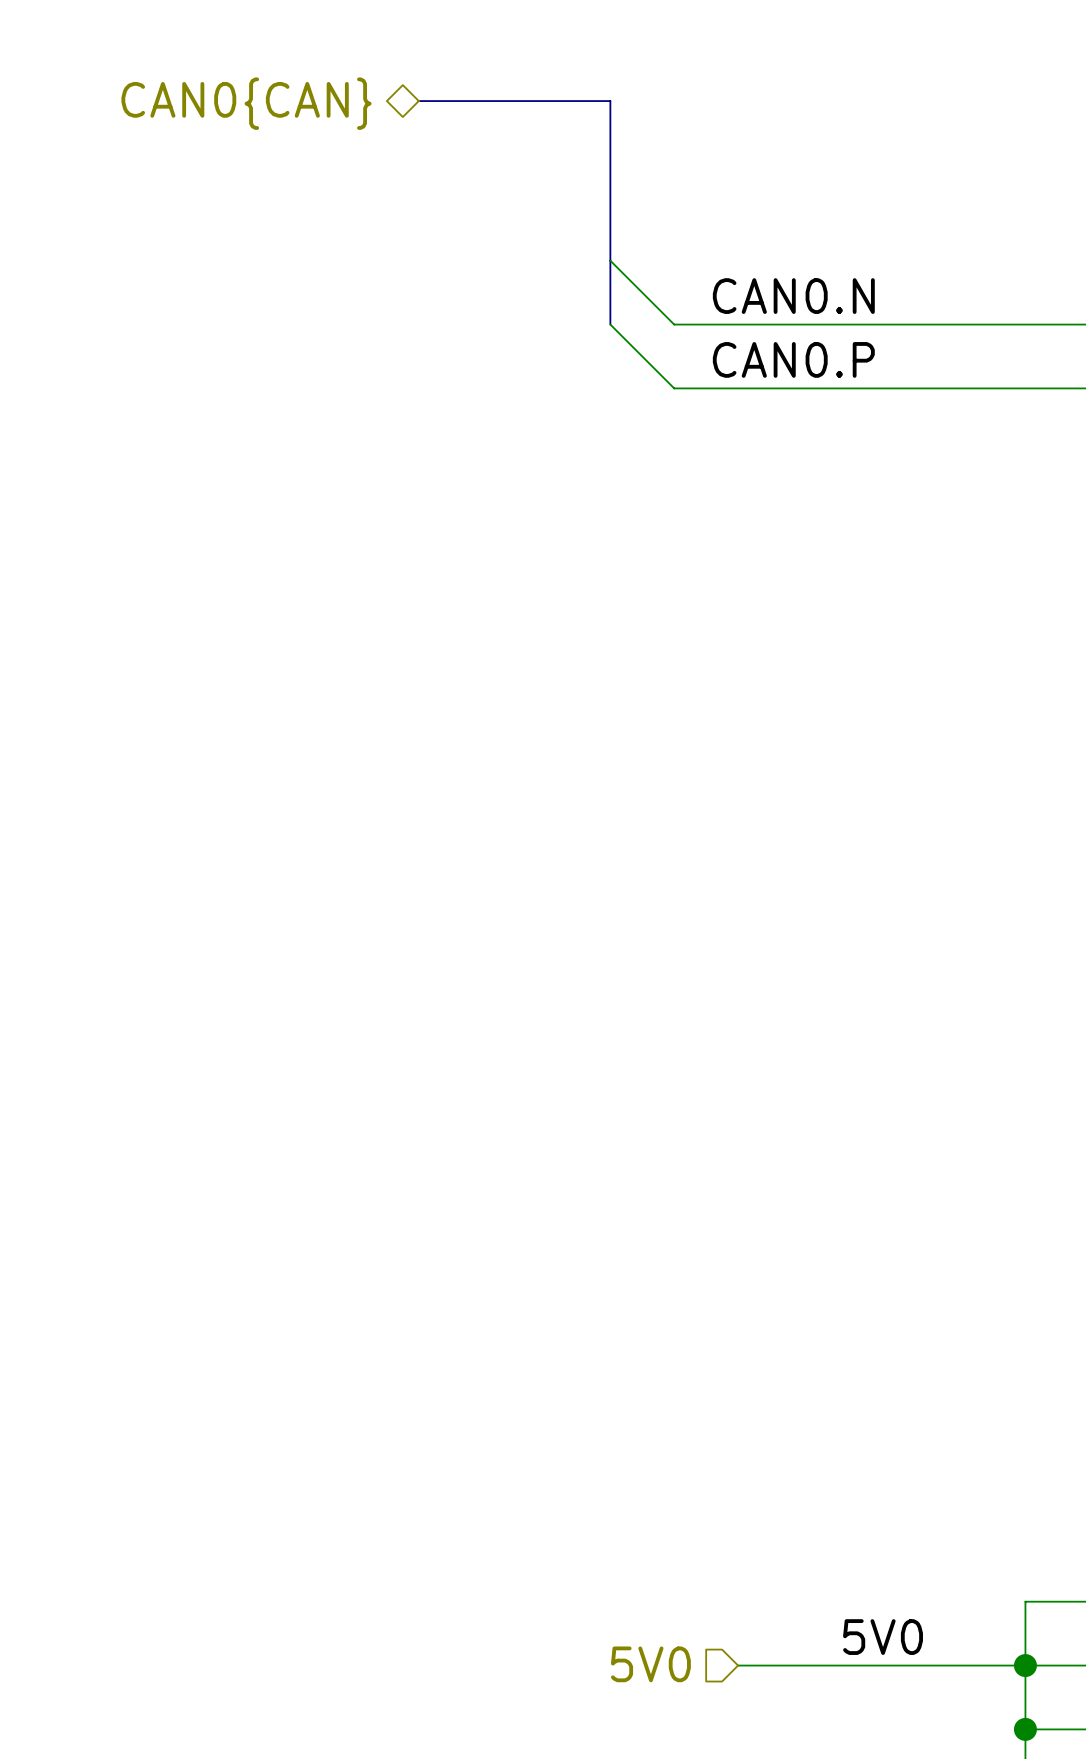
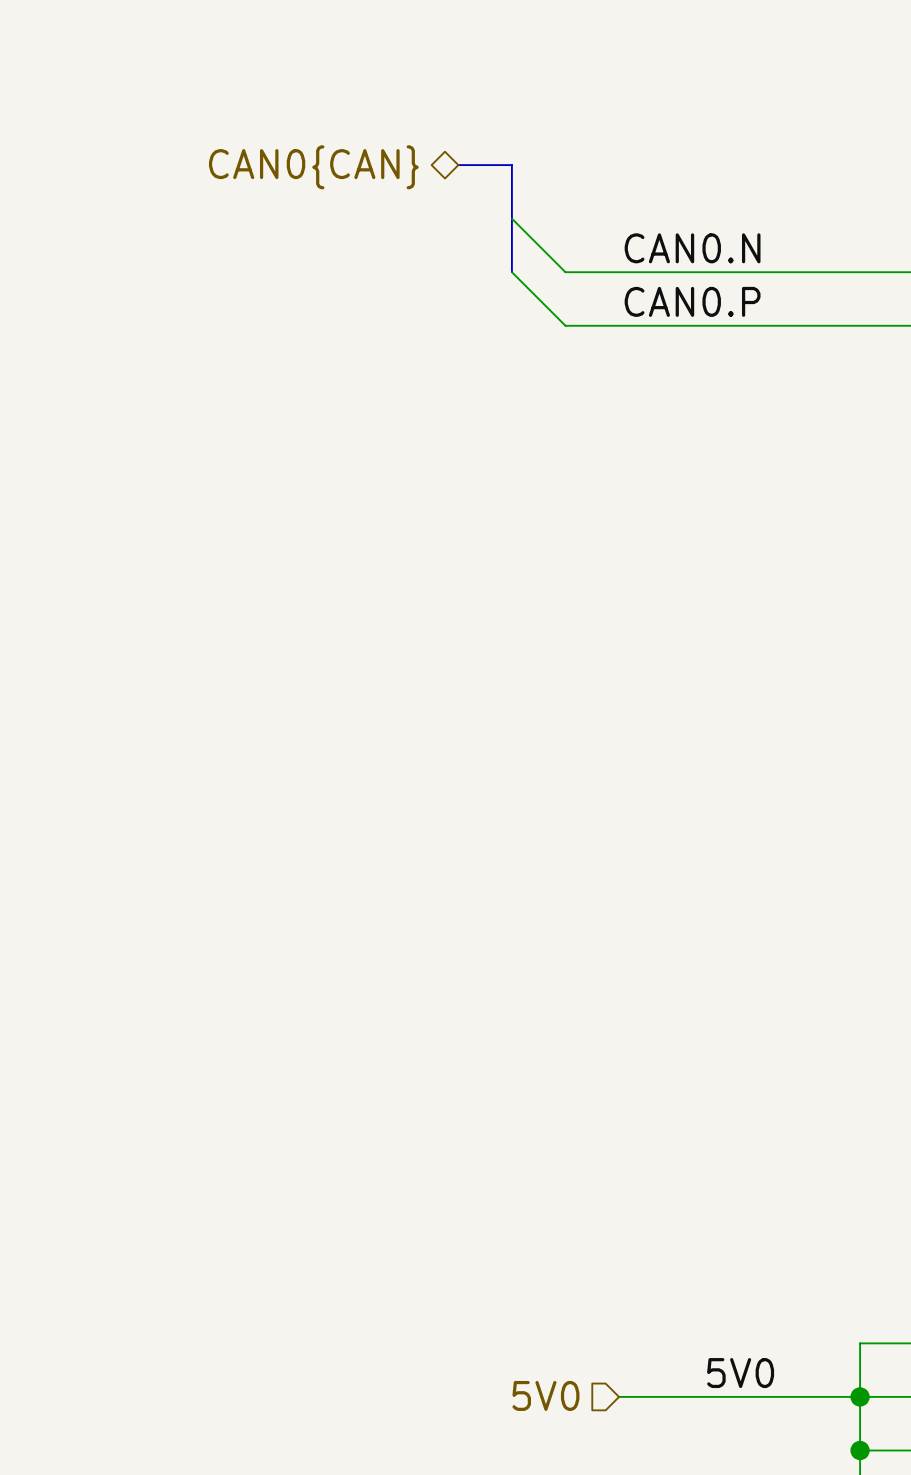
bus: (418, 101) (610, 101) (610, 196) -> (458, 165) (511, 165)
hierarchical label position: CAN0{CAN} (246, 103) -> CAN0{CAN} (313, 167)
label position: CAN0.N (793, 296) -> CAN0.N (692, 248)
label position: CAN0.P (793, 359) -> CAN0.P (692, 301)

